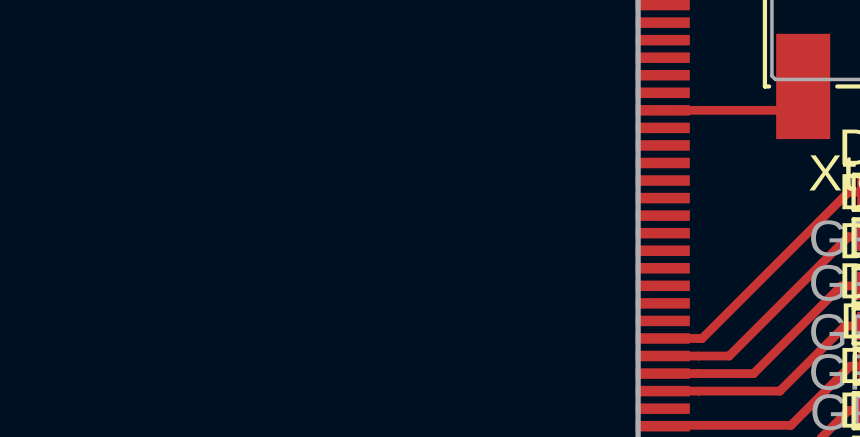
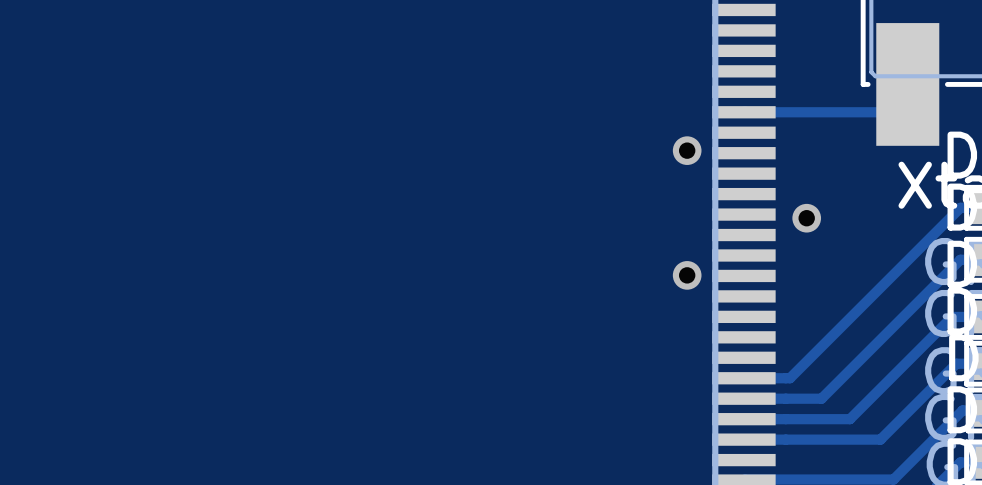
via: none -> (687, 150)
via: none -> (806, 218)
via: none -> (687, 275)

